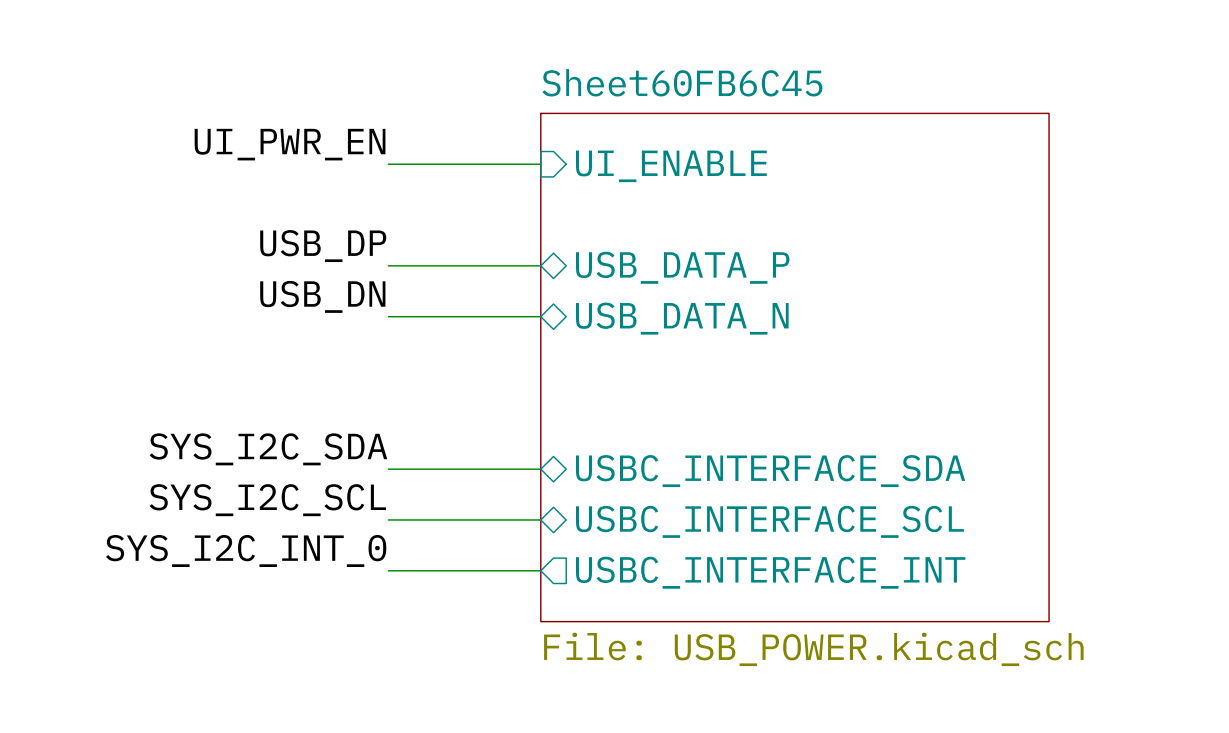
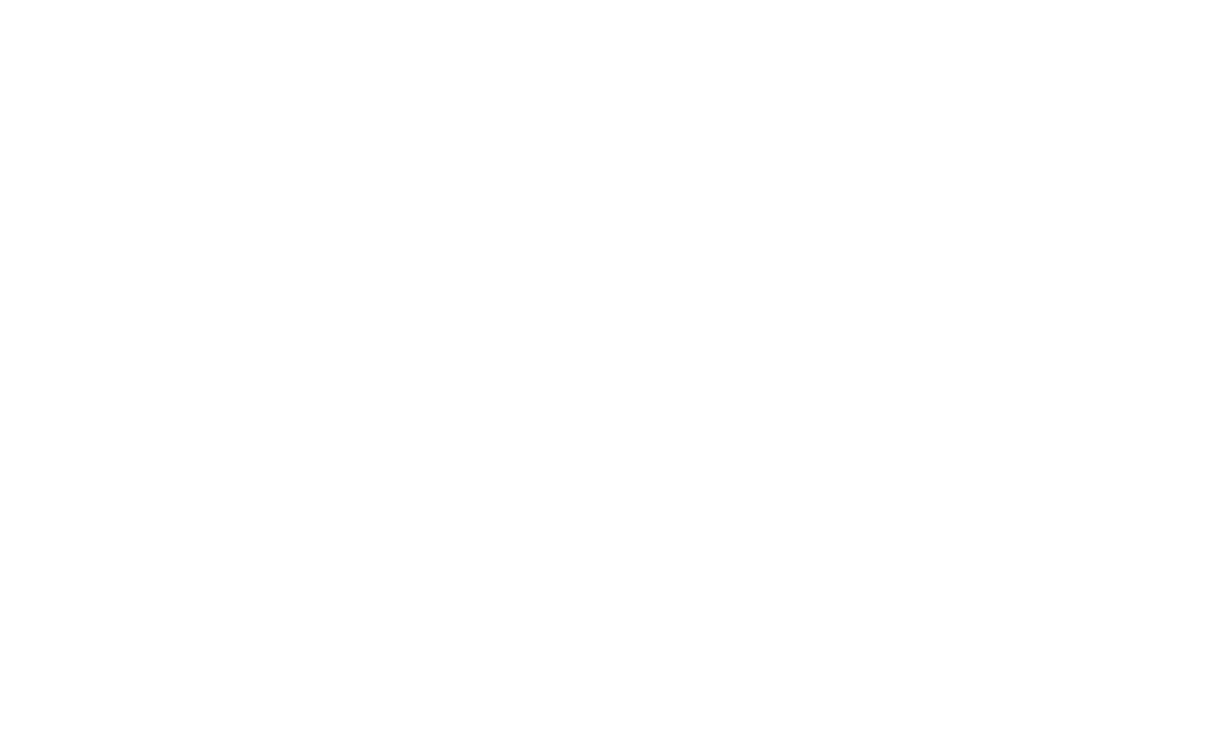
label: UI_PWR_EN (290, 144) -> none
wire: (388, 164) (540, 164) -> none
sheet pin: UI_ENABLE (671, 166) -> none
label: USB_DP (323, 246) -> none
wire: (388, 265) (540, 265) -> none
sheet pin: USB_DATA_P (682, 267) -> none
label: USB_DN (322, 296) -> none
wire: (388, 316) (540, 316) -> none
sheet pin: USB_DATA_N (682, 318) -> none
sheet Sheet60FB6C45: File: USB_POWER.kicad_sch (794, 367) -> none
label: SYS_I2C_SDA (268, 449) -> none
wire: (388, 469) (540, 469) -> none
sheet pin: USBC_INTERFACE_SDA (770, 471) -> none
label: SYS_I2C_SCL (267, 500) -> none
wire: (388, 519) (540, 519) -> none
sheet pin: USBC_INTERFACE_SCL (769, 521) -> none
label: SYS_I2C_INT_0 (246, 550) -> none
wire: (388, 570) (540, 570) -> none
sheet pin: USBC_INTERFACE_INT (770, 572) -> none

